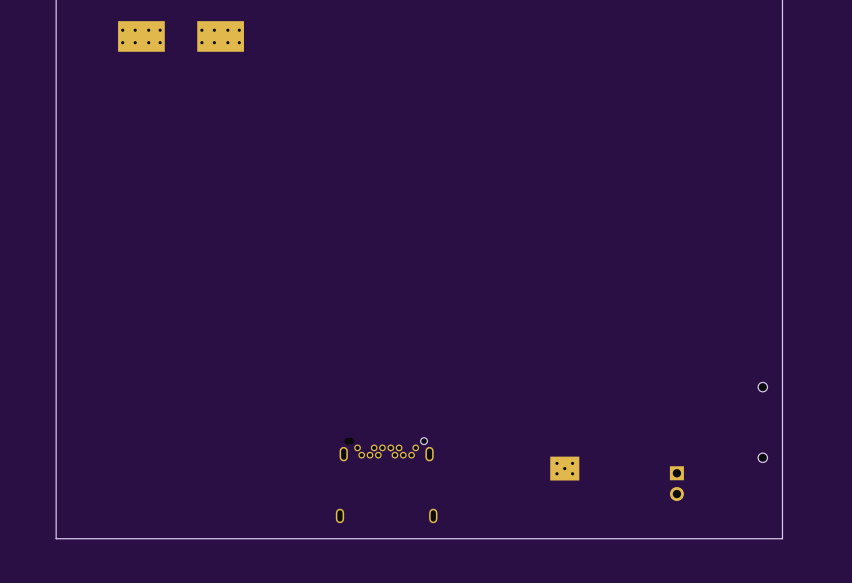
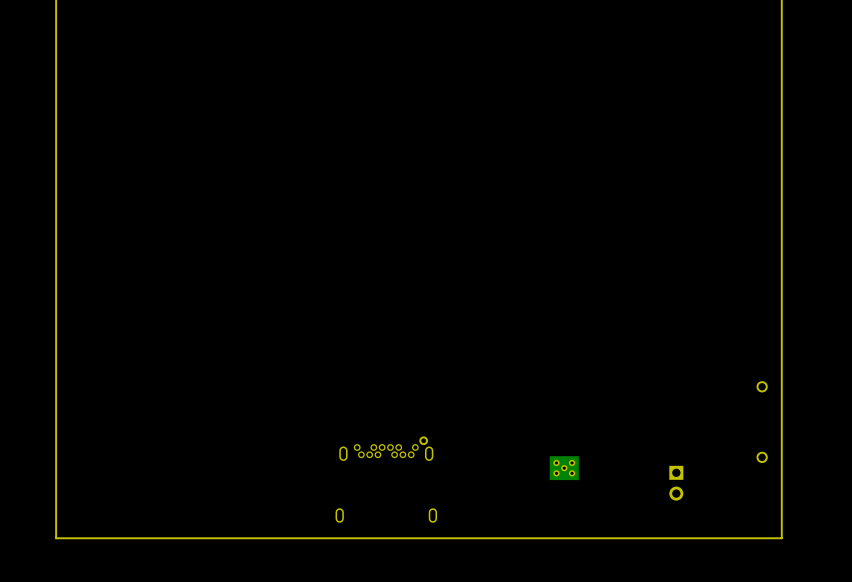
part: (141, 36) -> none
part: (220, 36) -> none

